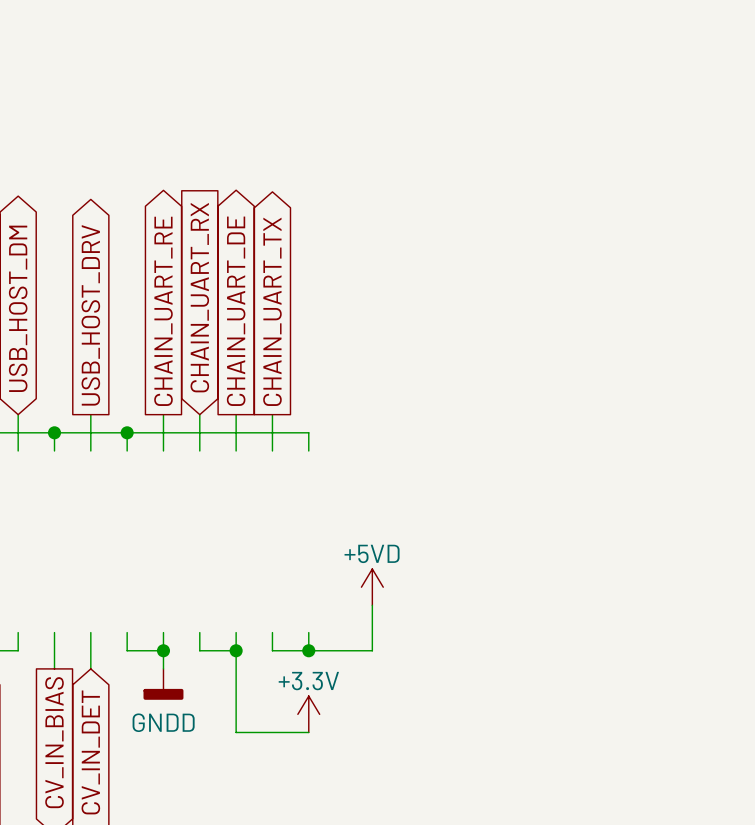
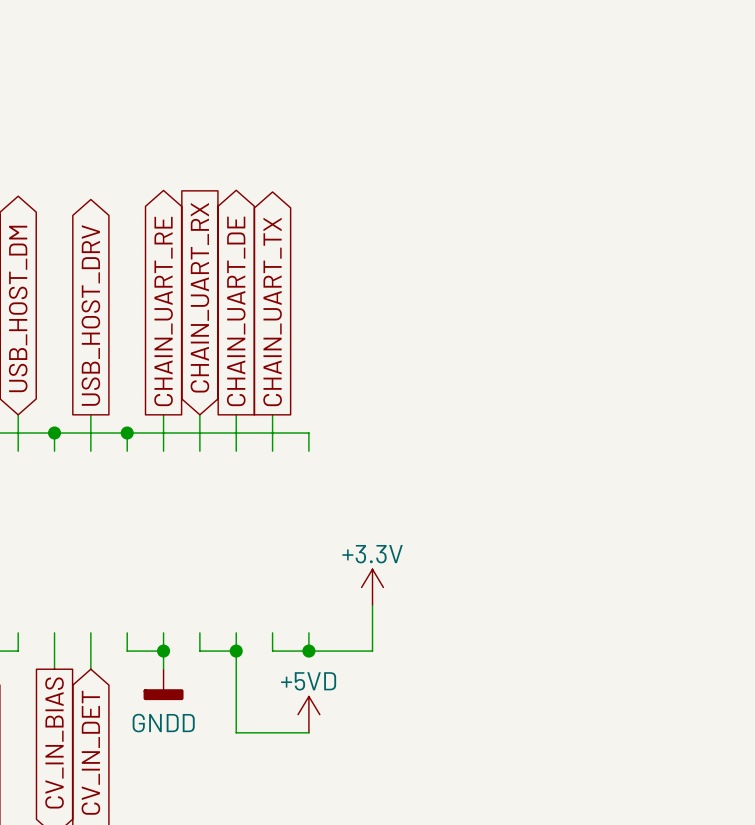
power symbol: +5VD (372, 587) -> +3.3V (372, 587)
power symbol: +3.3V (308, 714) -> +5VD (308, 714)

